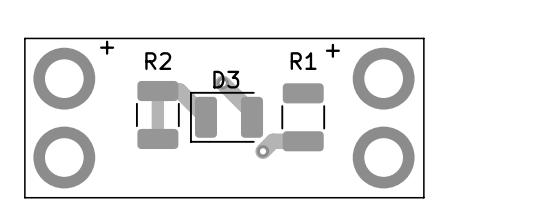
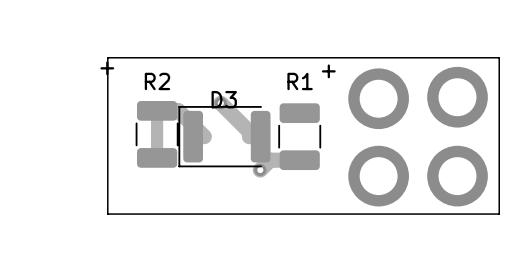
board edge: (423, 38) (24, 38) (24, 197) (423, 197) (423, 38) -> (499, 57) (499, 214) (107, 214) (107, 57) (499, 57)
part: none -> (457, 97)
part: (64, 78) -> none
D3 footprint: [190, 91, 264, 143] -> [178, 106, 271, 168]
part: (64, 157) -> none
part: none -> (457, 176)

